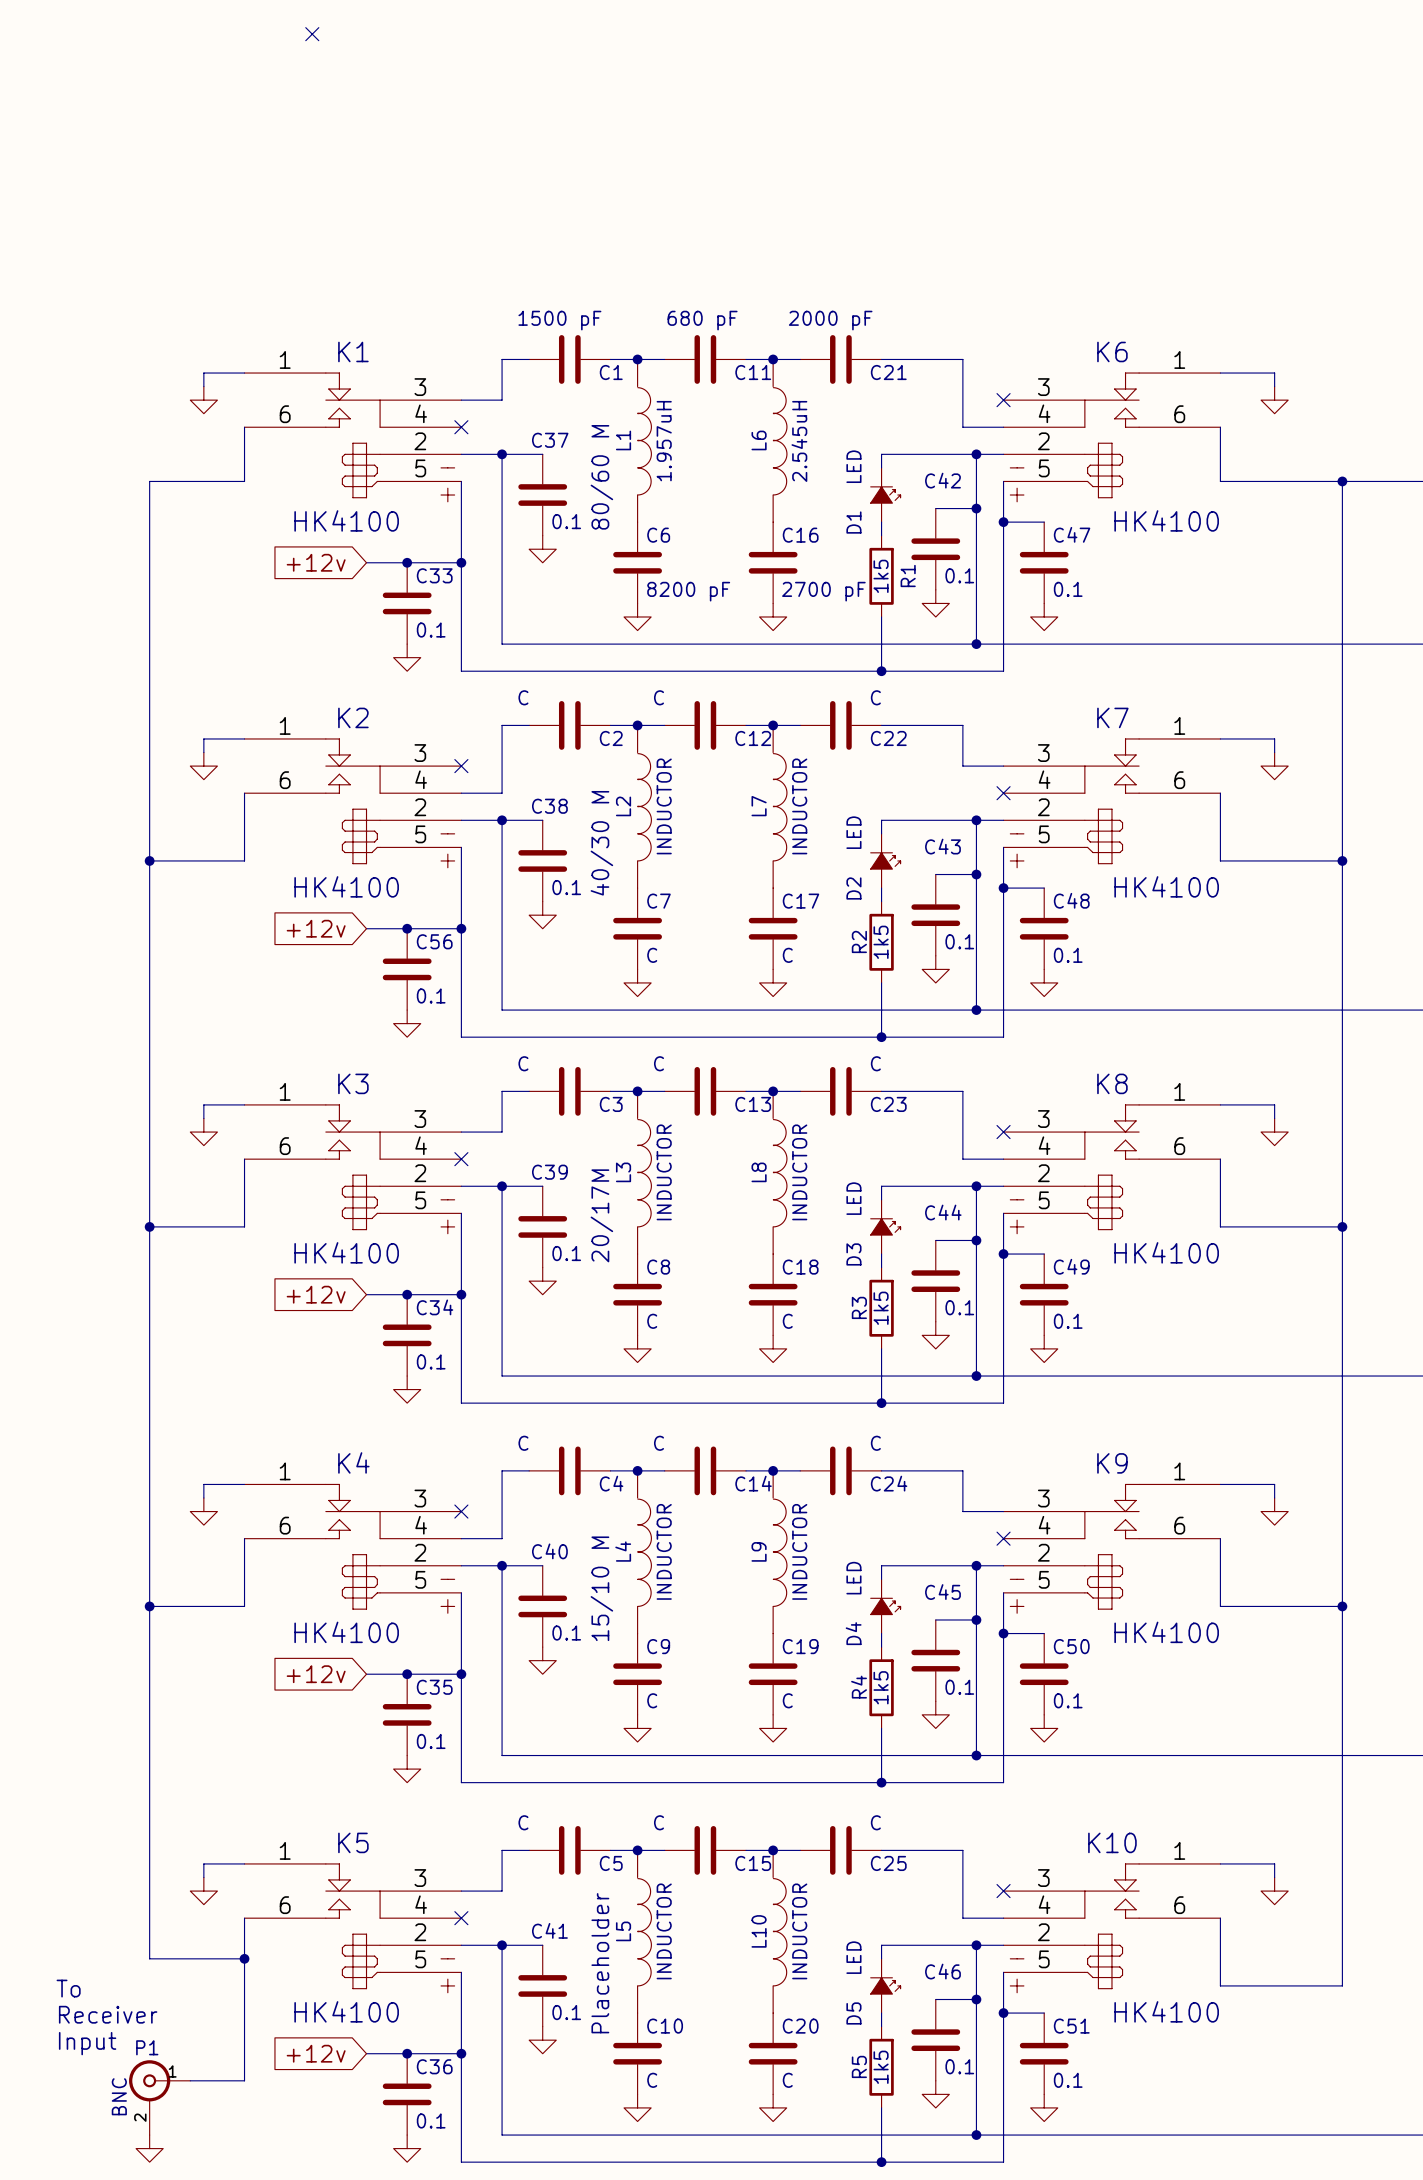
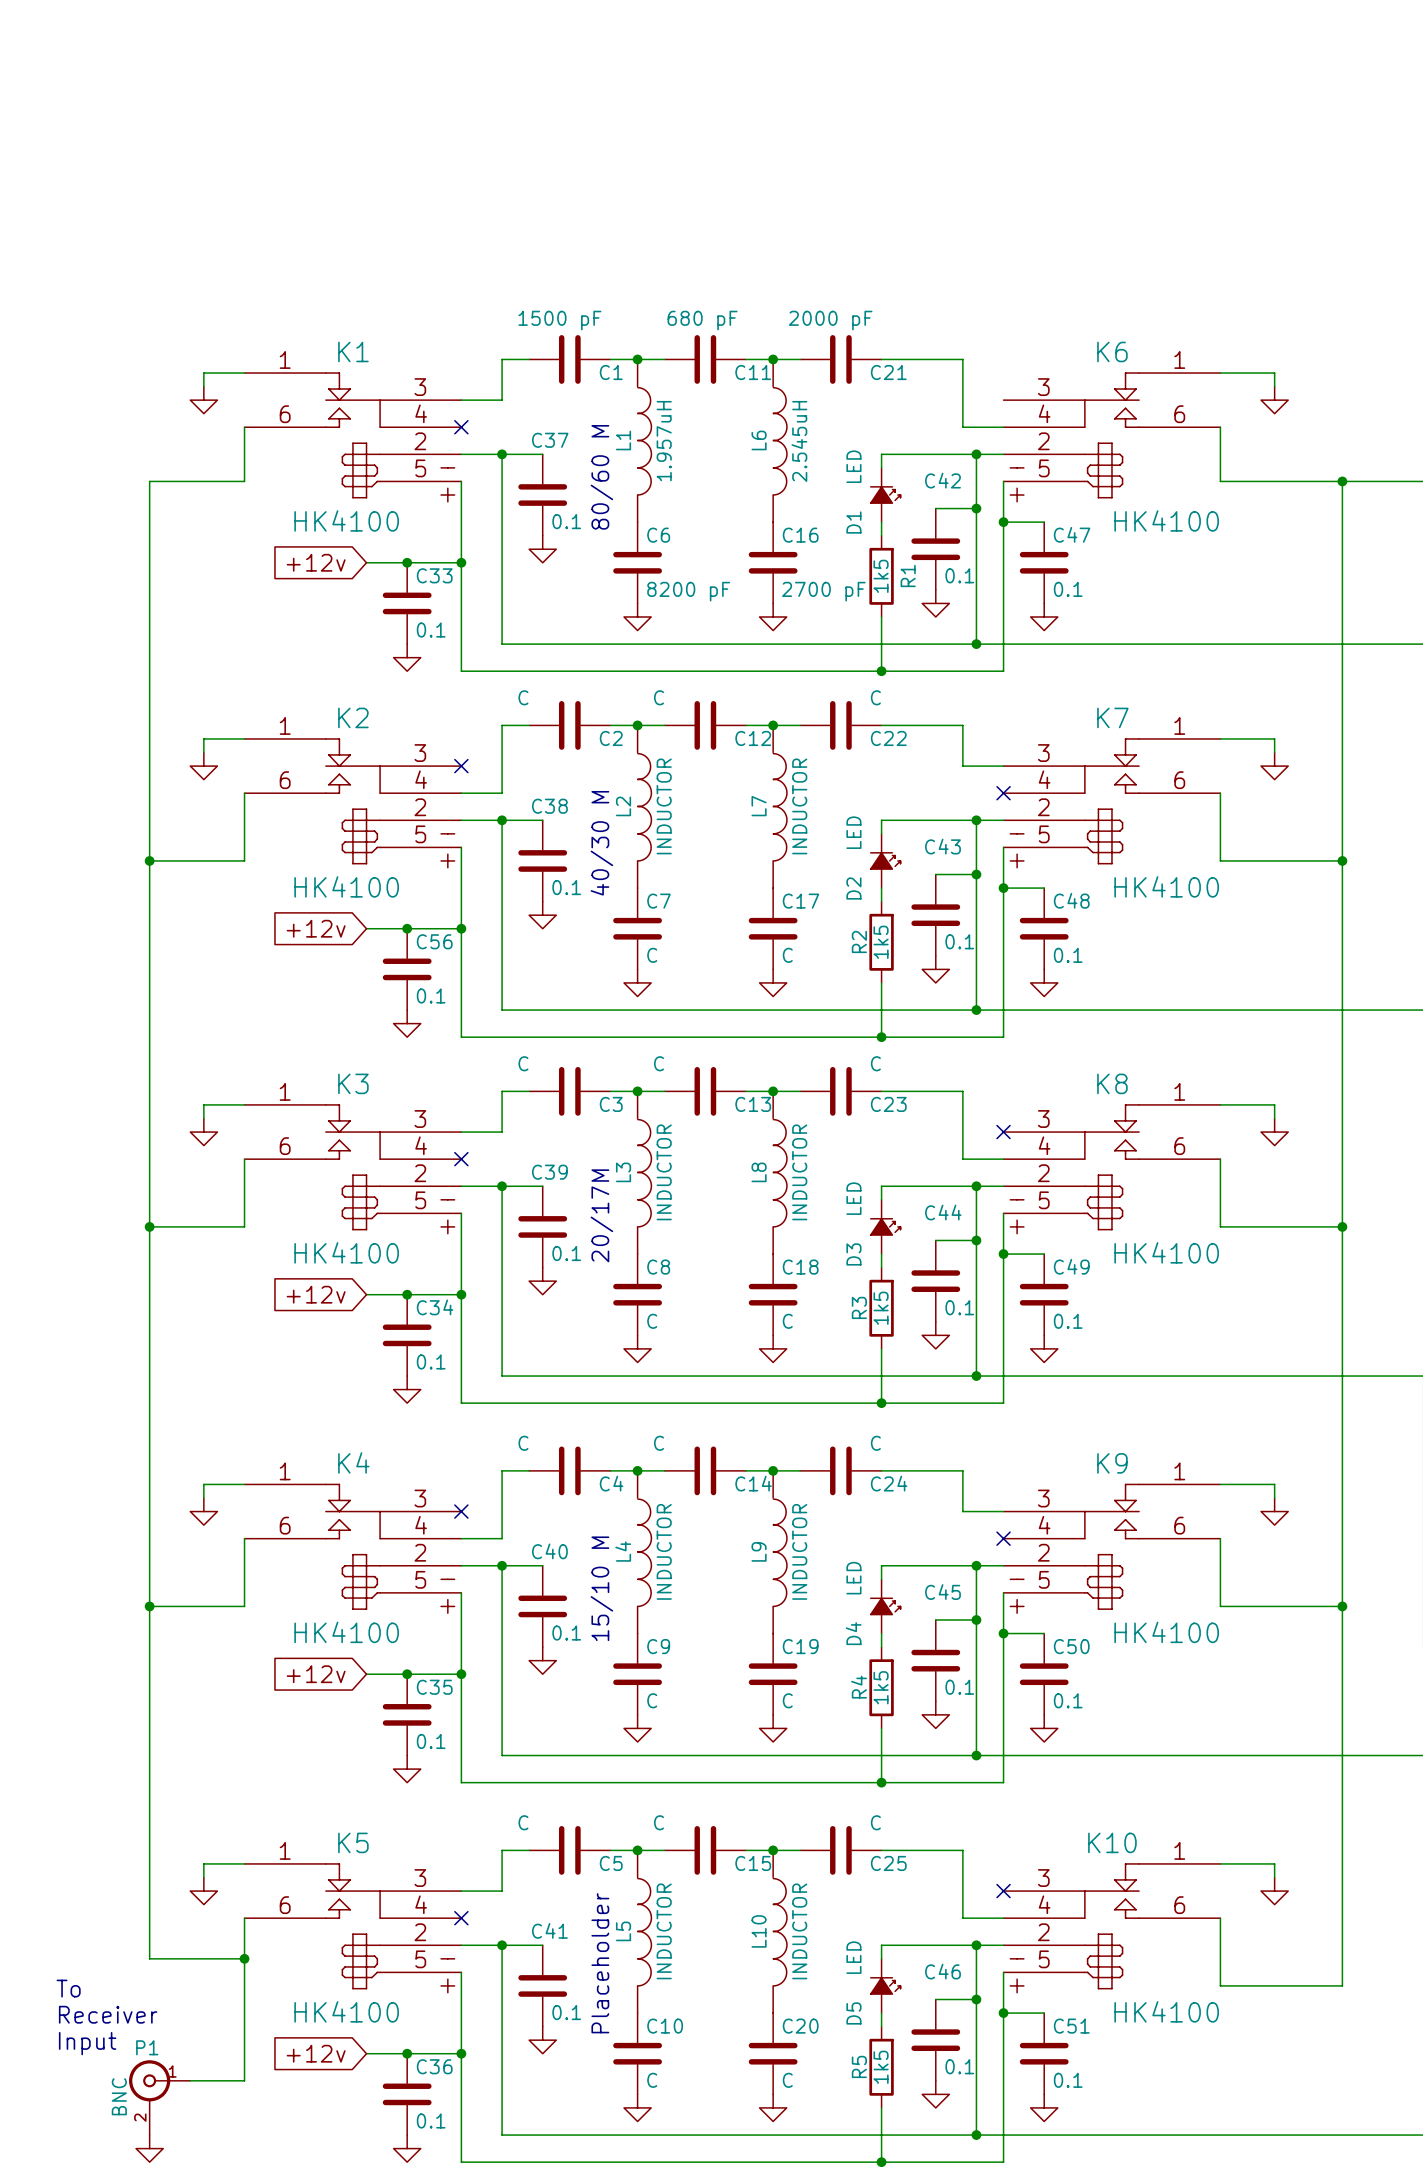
no-connect mark: (312, 34) -> none
no-connect mark: (1003, 400) -> none

